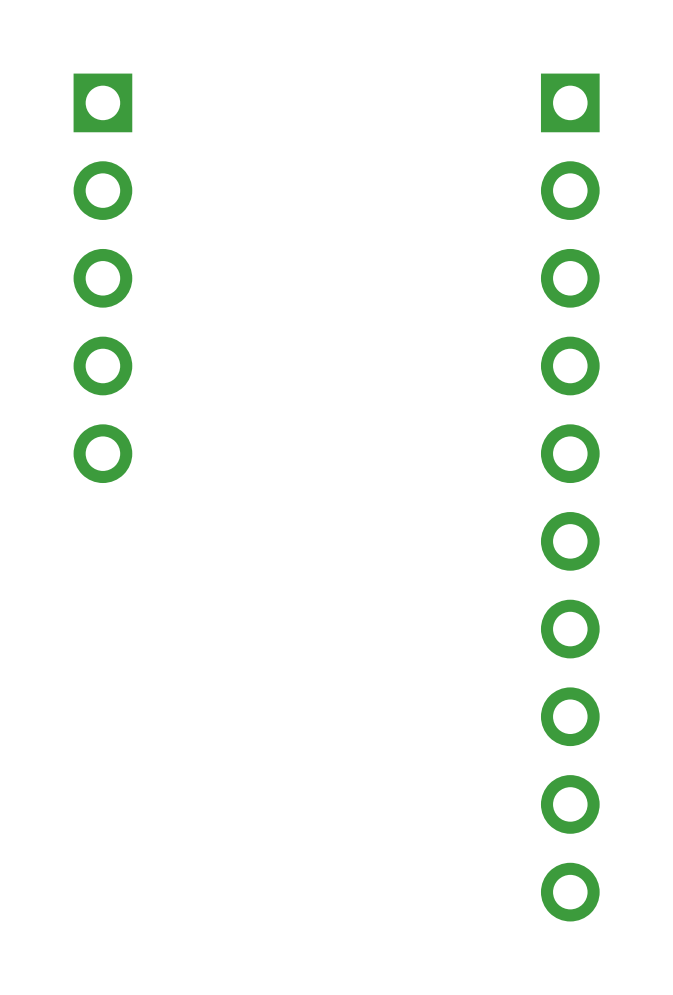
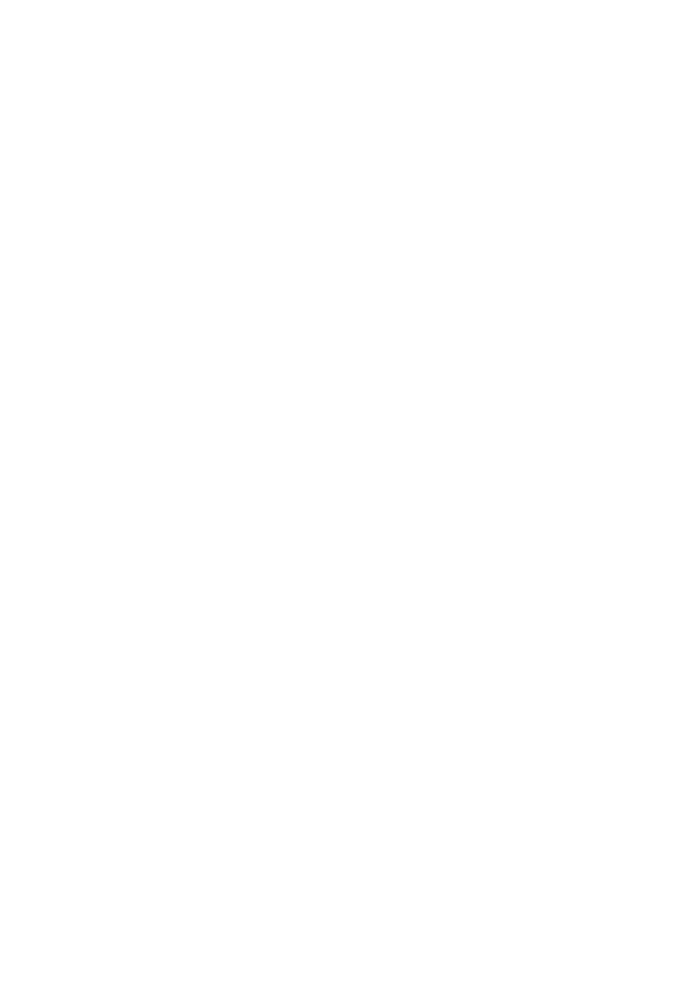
part: (102, 278) -> none
part: (570, 497) -> none

